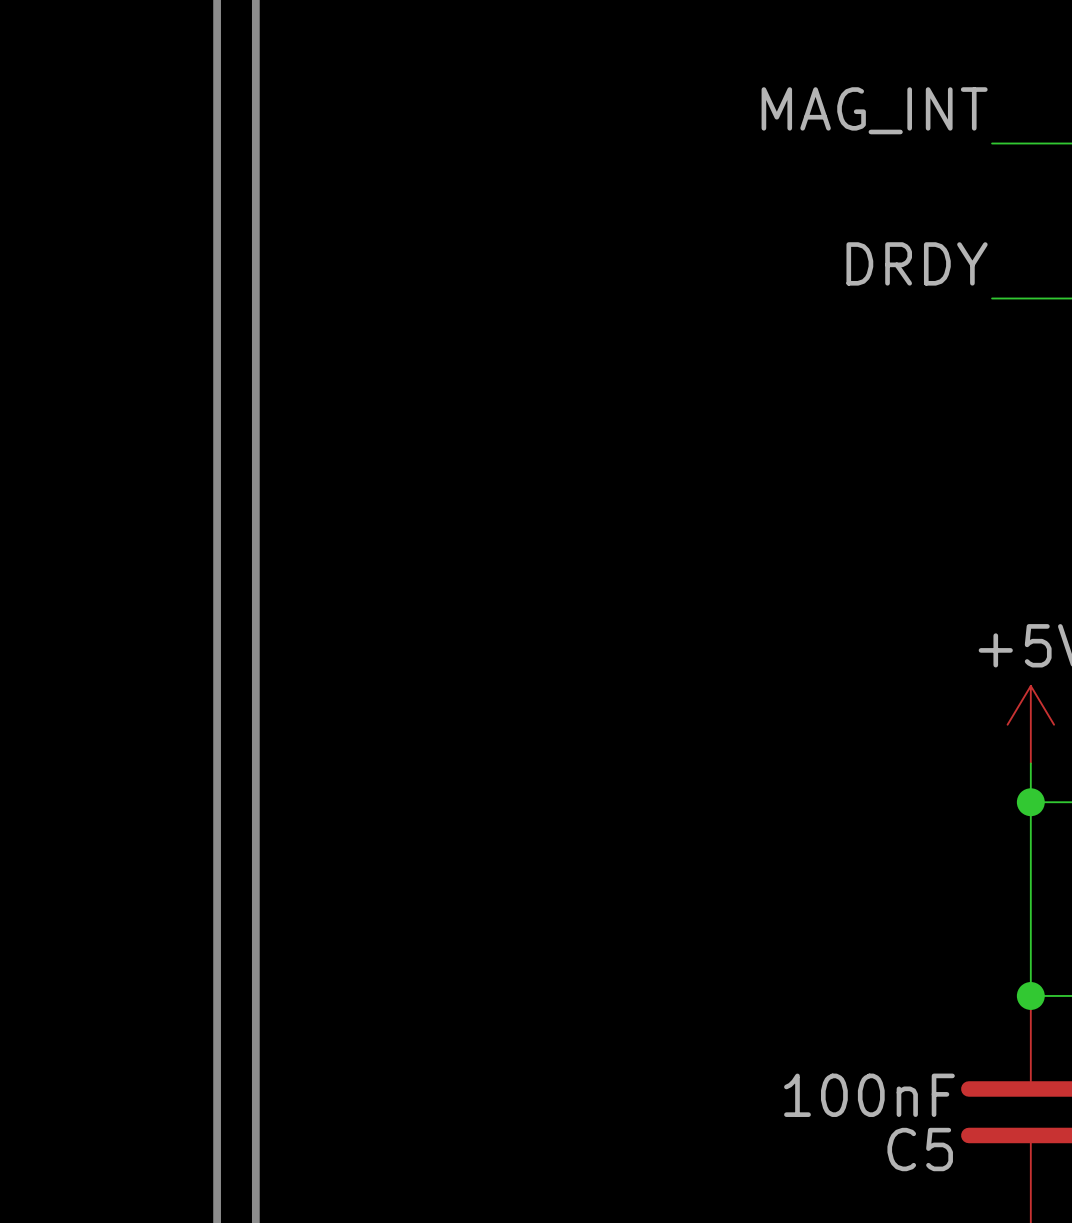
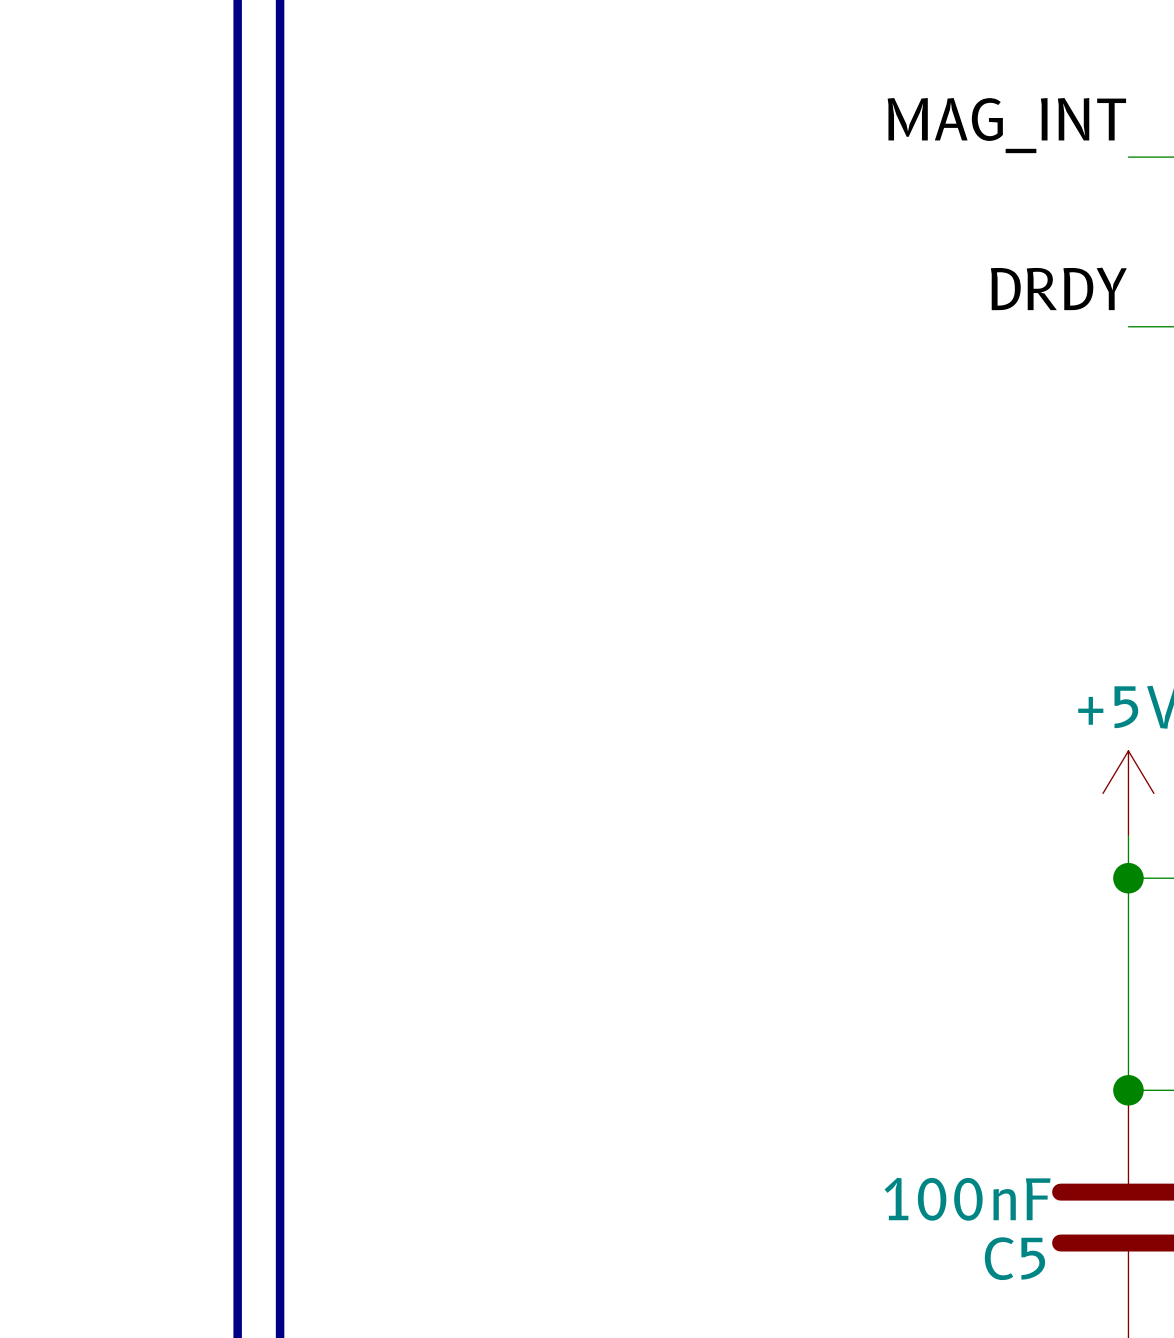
label position: MAG_INT (874, 110) -> MAG_INT (1006, 125)
wire: (992, 143) (1030, 143) -> none
label position: DRDY (917, 263) -> DRDY (1058, 288)
wire: (992, 298) (1030, 298) -> none

